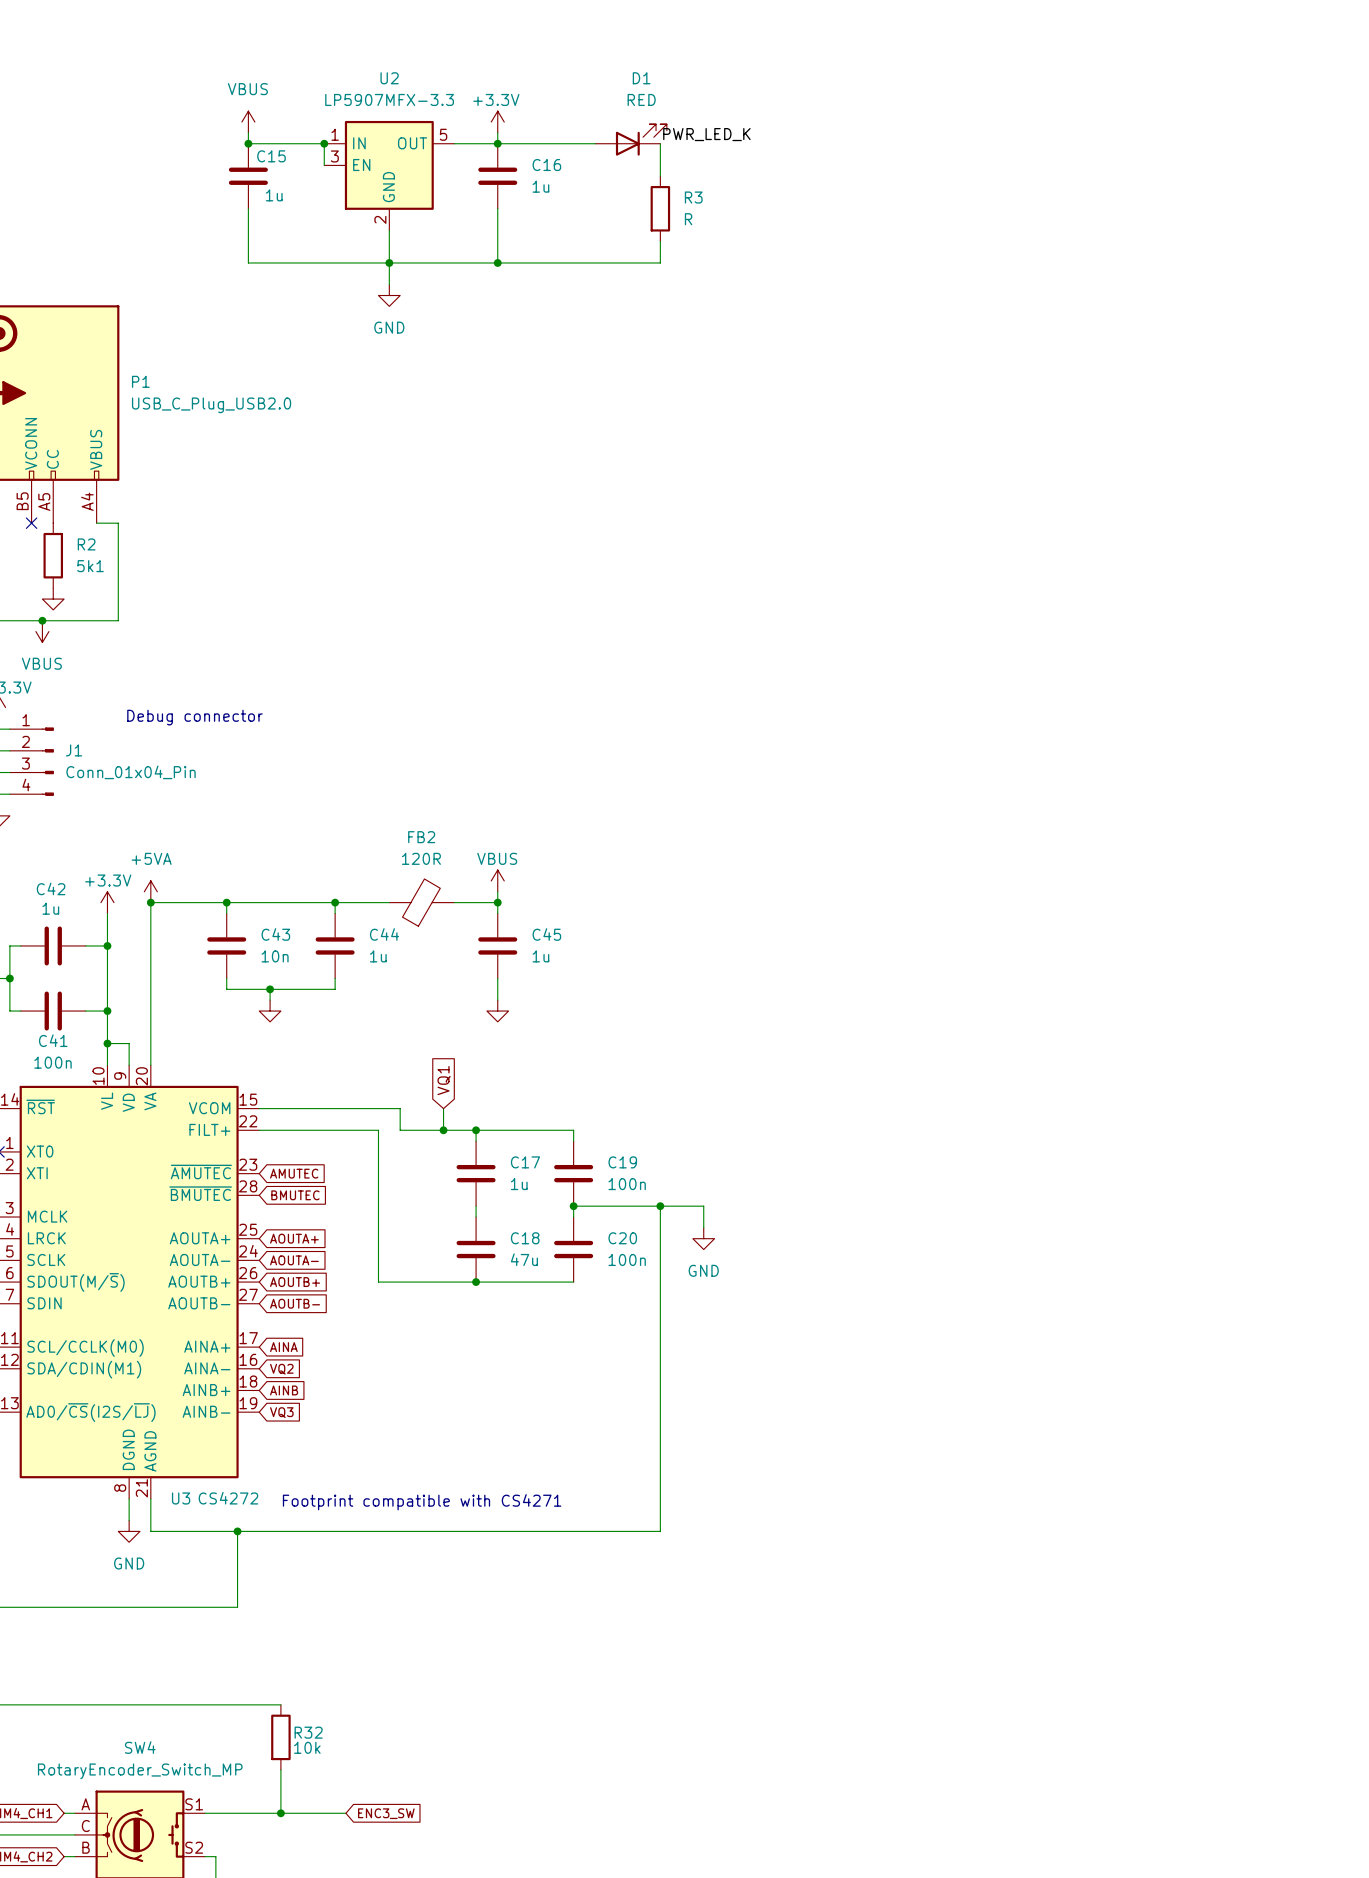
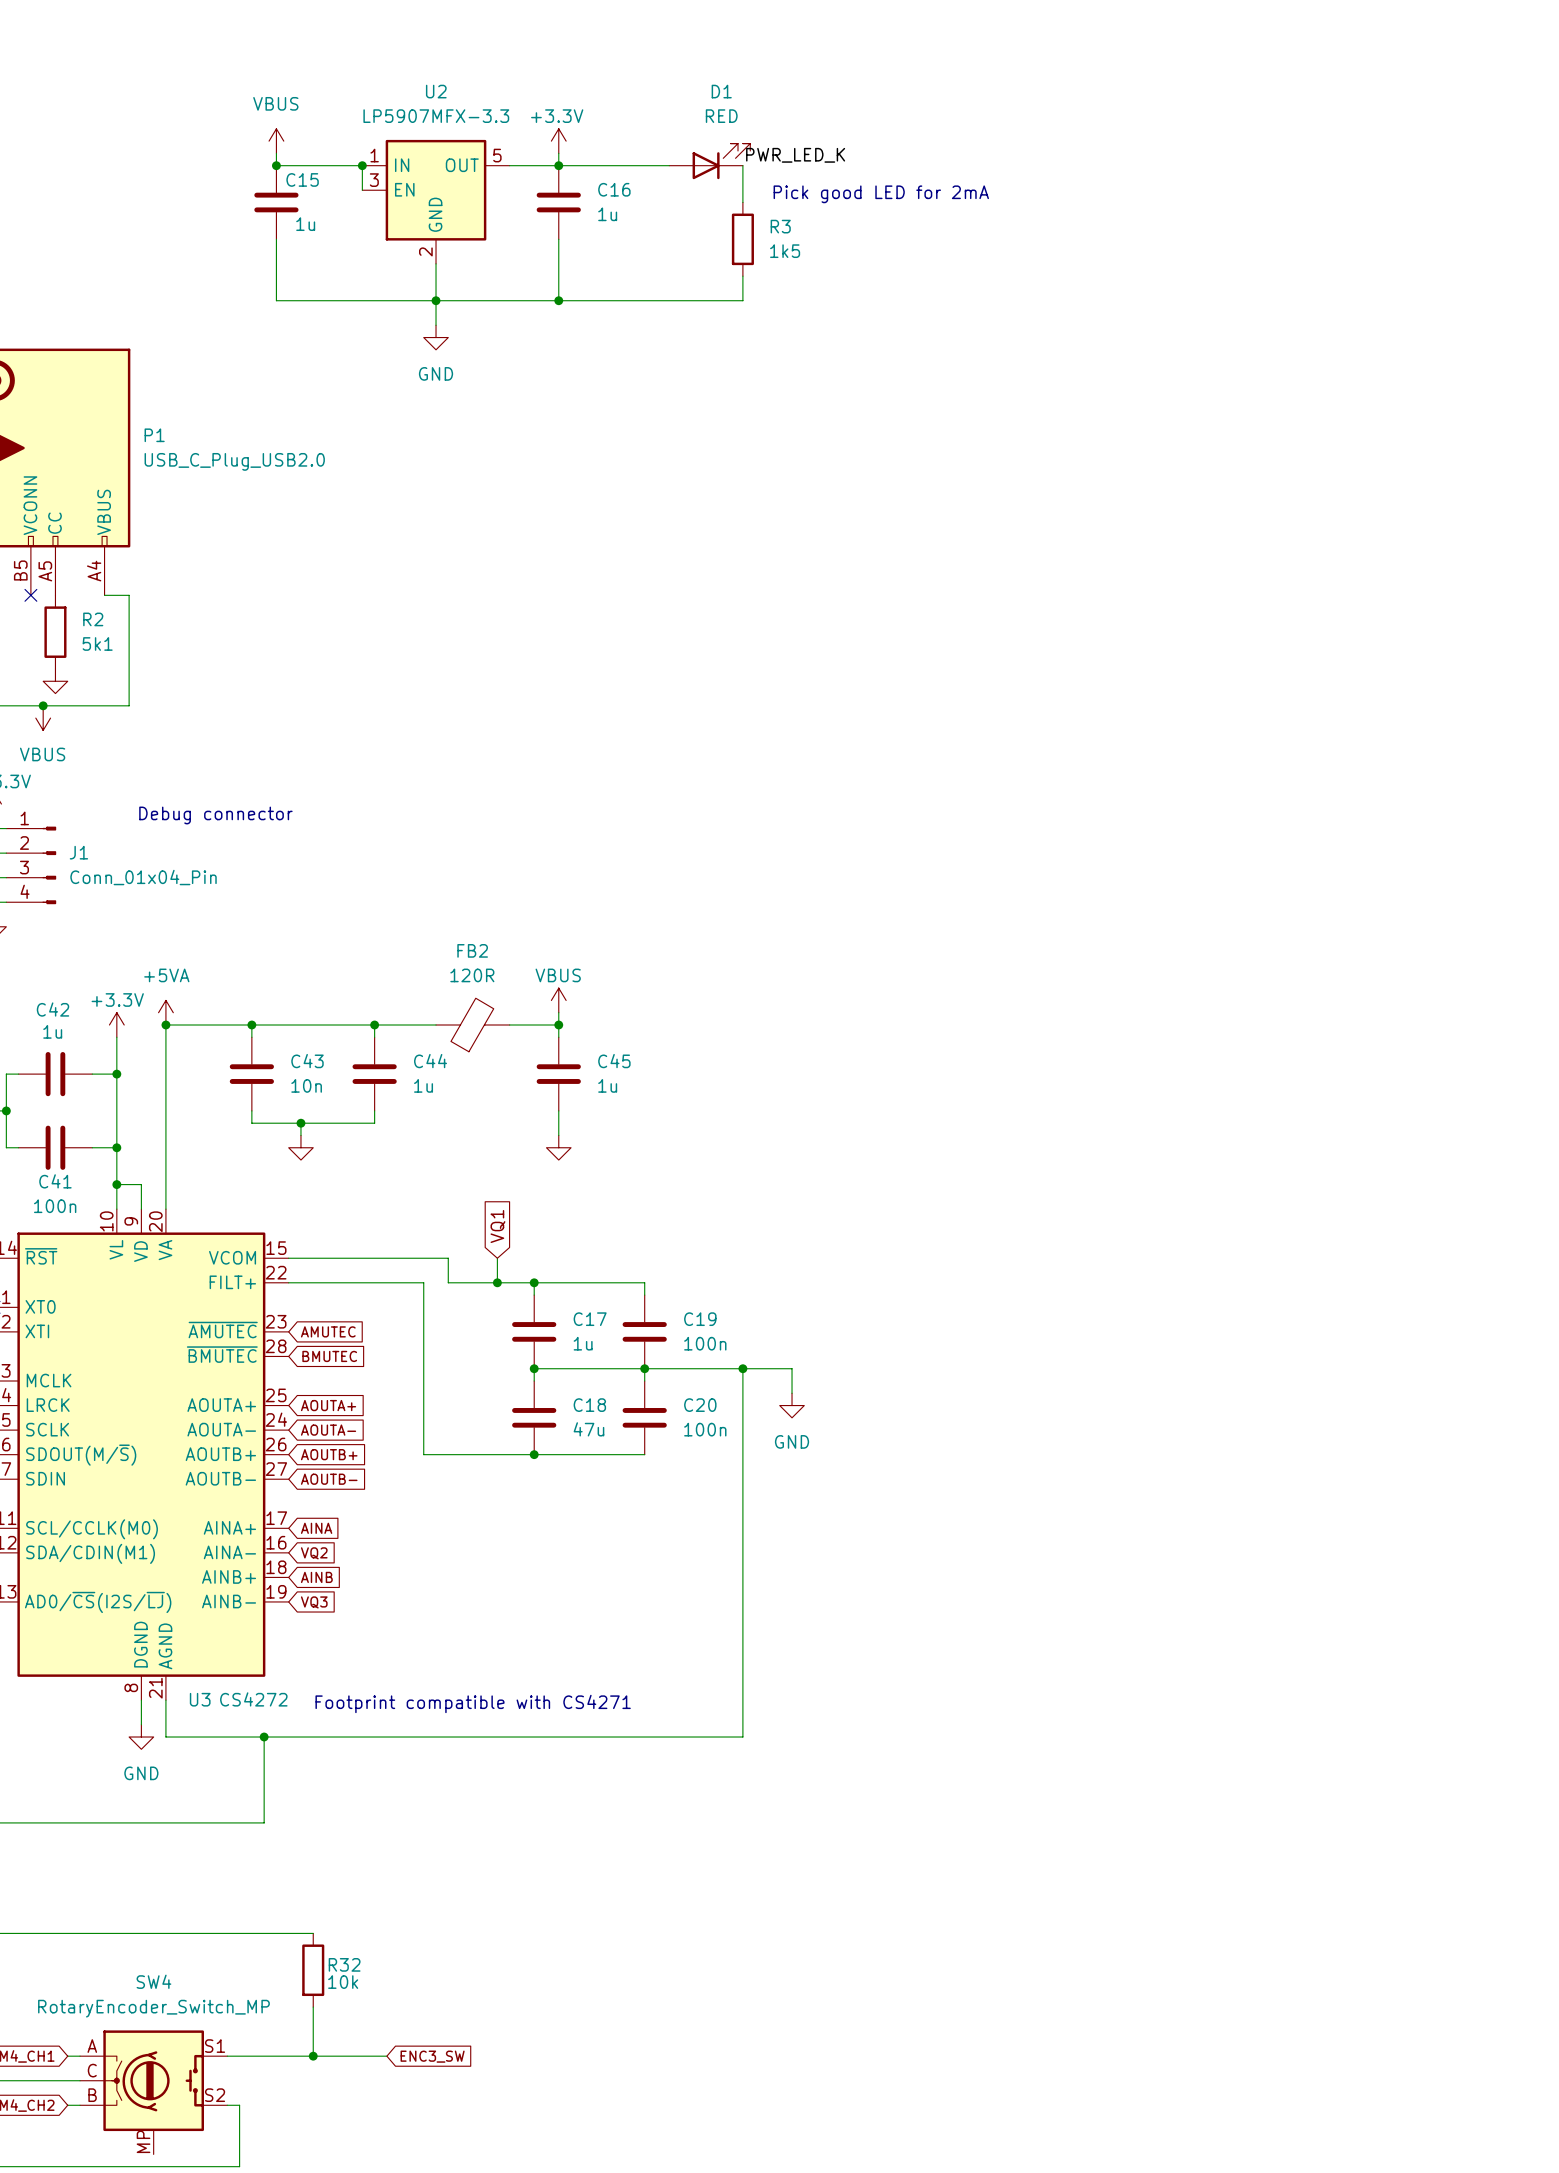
text: none -> Pick good LED for 2mA (881, 194)
R3 value: R (688, 219) -> 1k5 (785, 251)
wire: none -> (534, 1368) (644, 1368)
junction: none -> (534, 1368)

